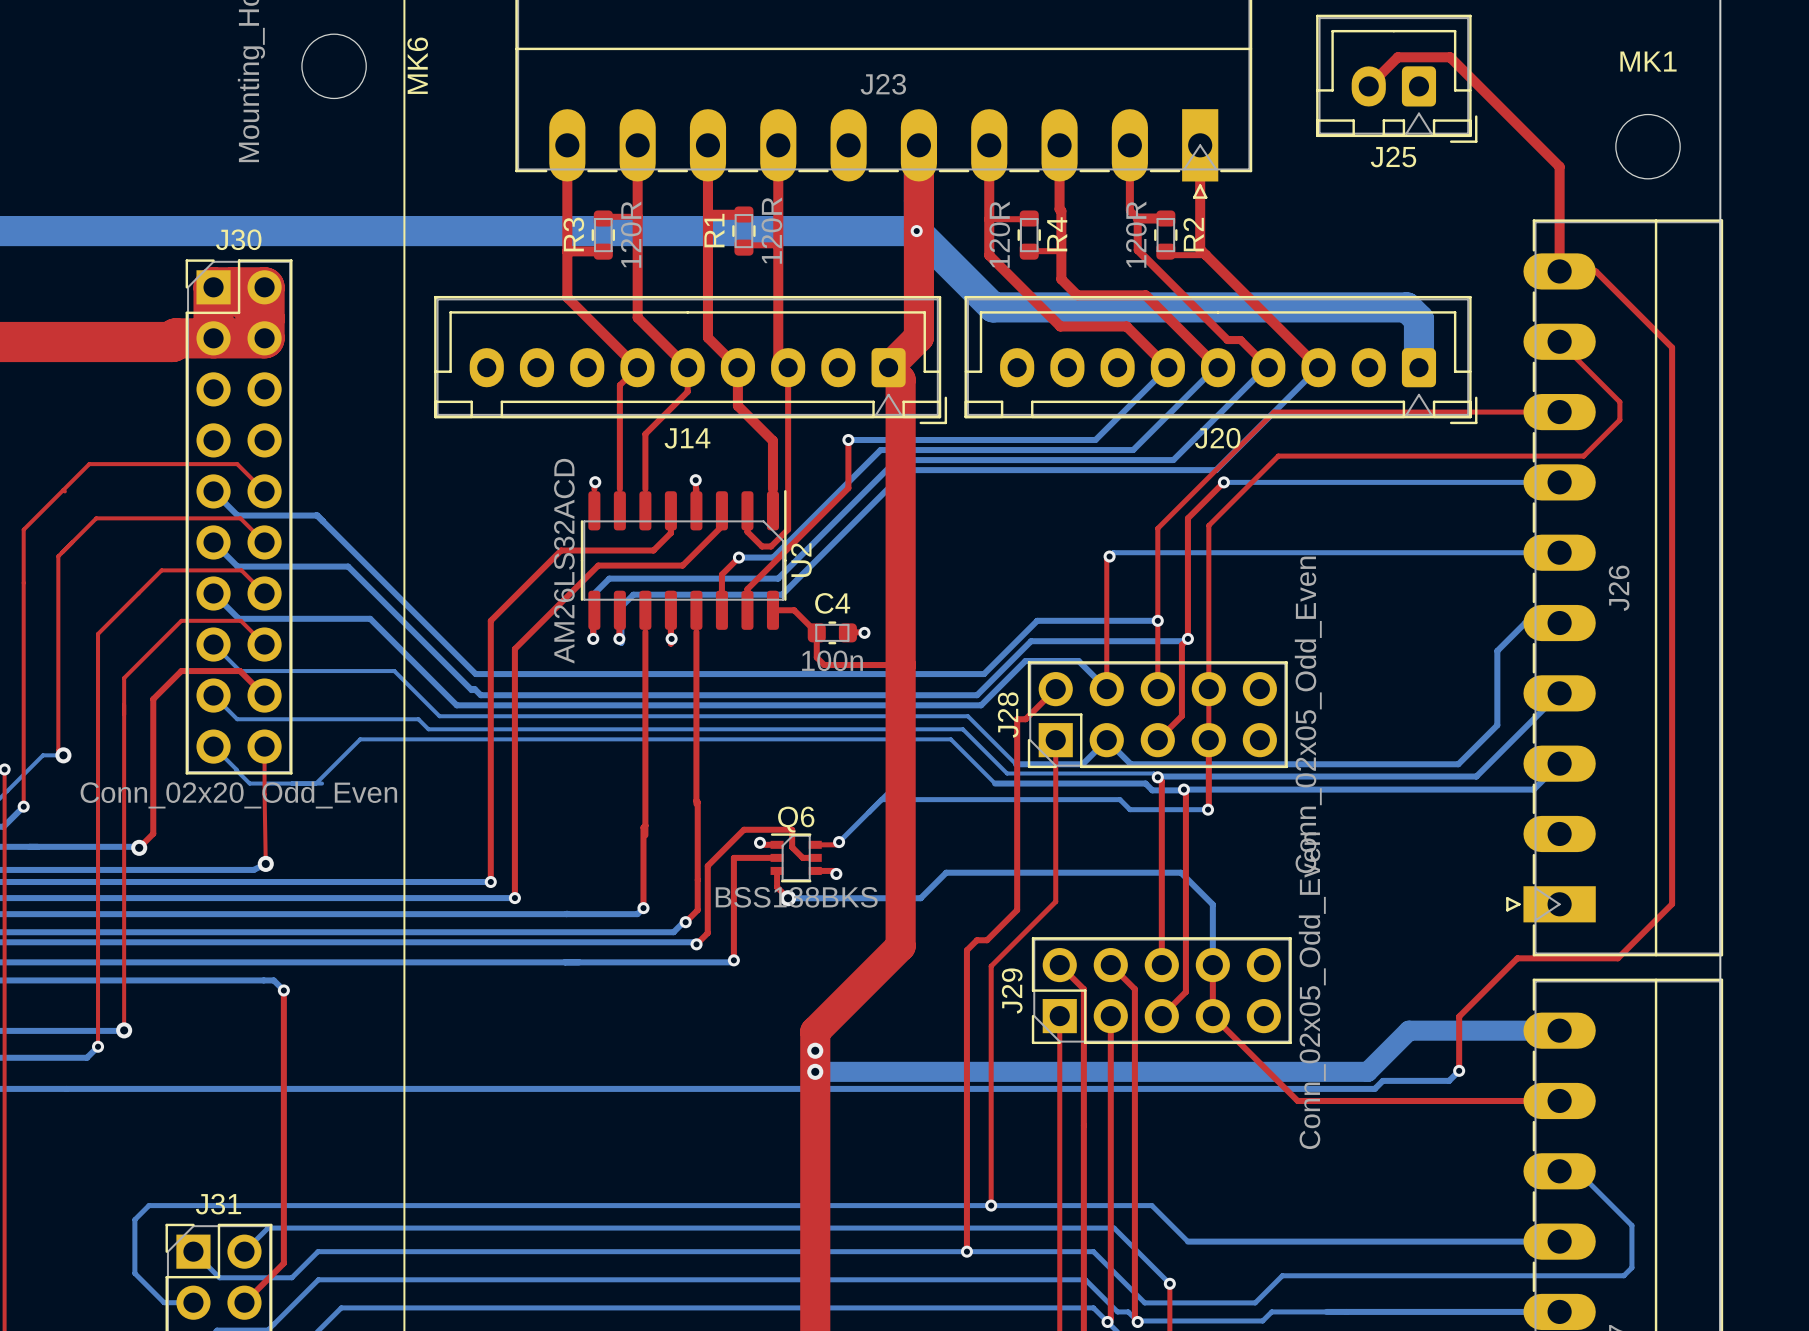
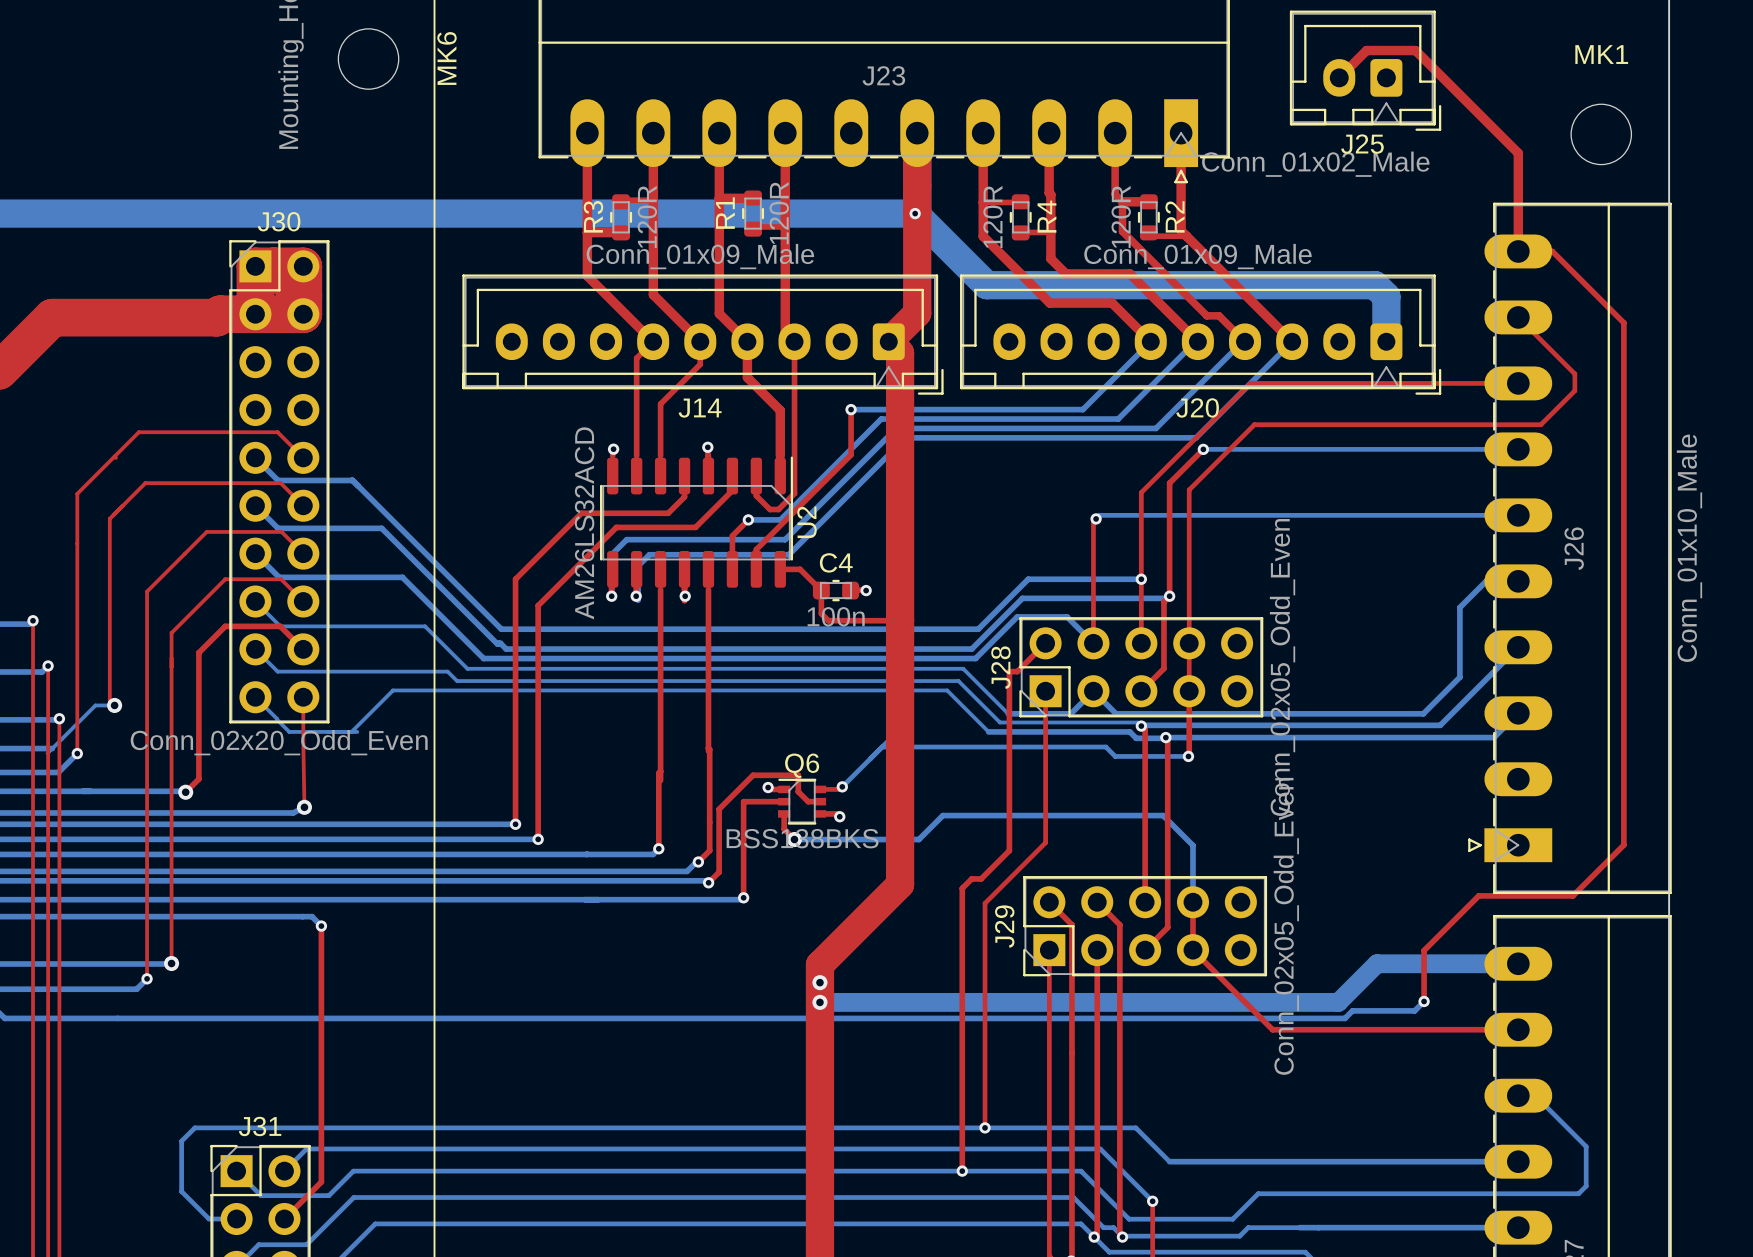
J25 value: none -> Conn_01x02_Male (1315, 164)
J14 value: none -> Conn_01x09_Male (700, 256)
J20 value: none -> Conn_01x09_Male (1197, 256)
J26 value: none -> Conn_01x10_Male (1689, 548)

